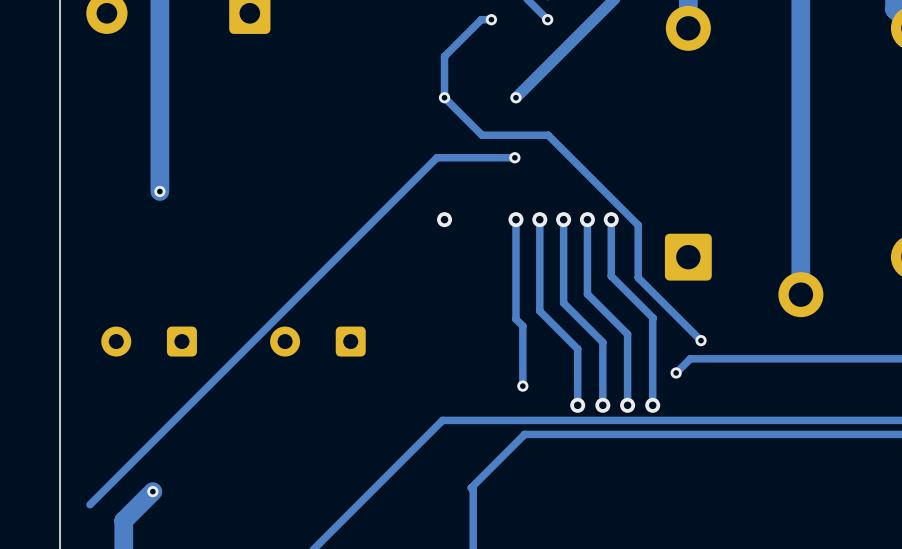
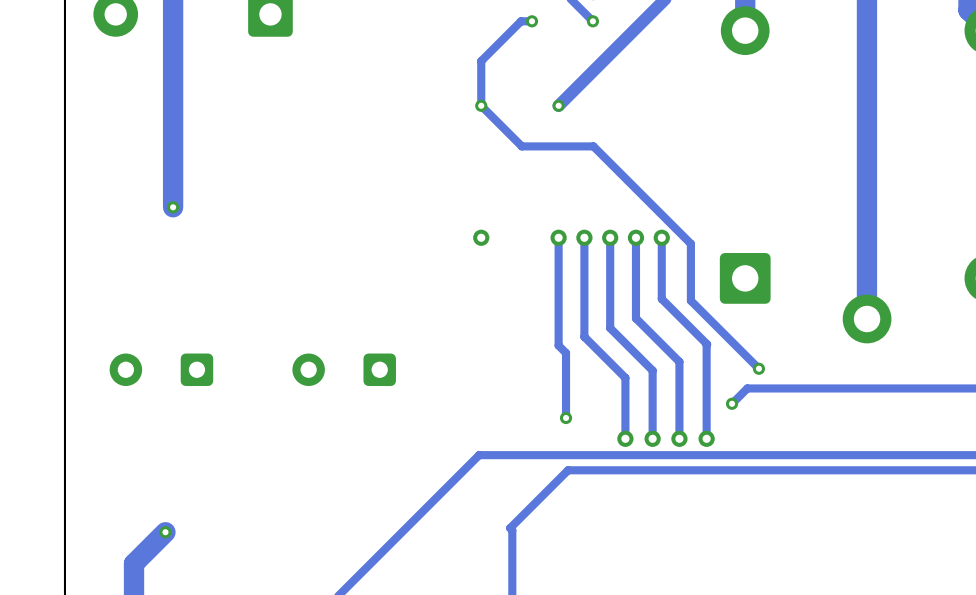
track: (514, 157) (436, 157) (89, 504) -> none
via: (514, 157) -> none

